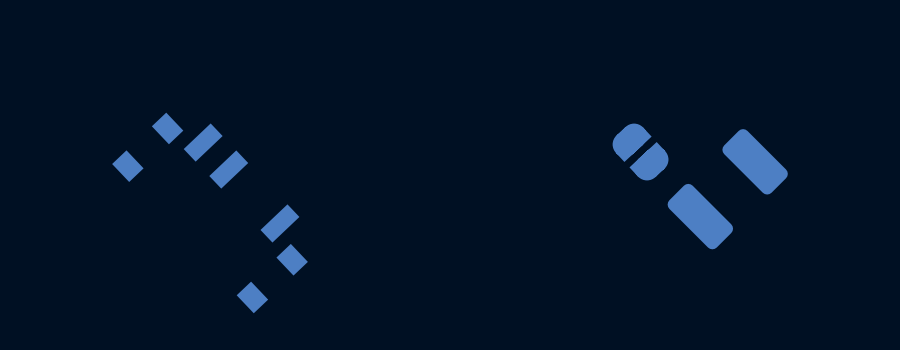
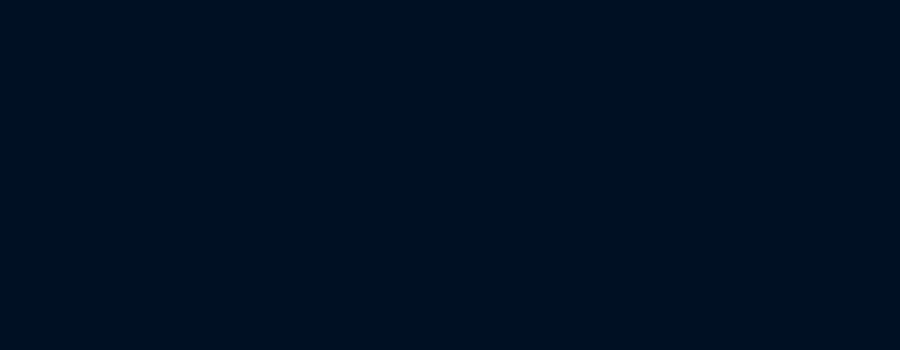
part: (640, 152) -> none
part: (727, 189) -> none
part: (210, 212) -> none

